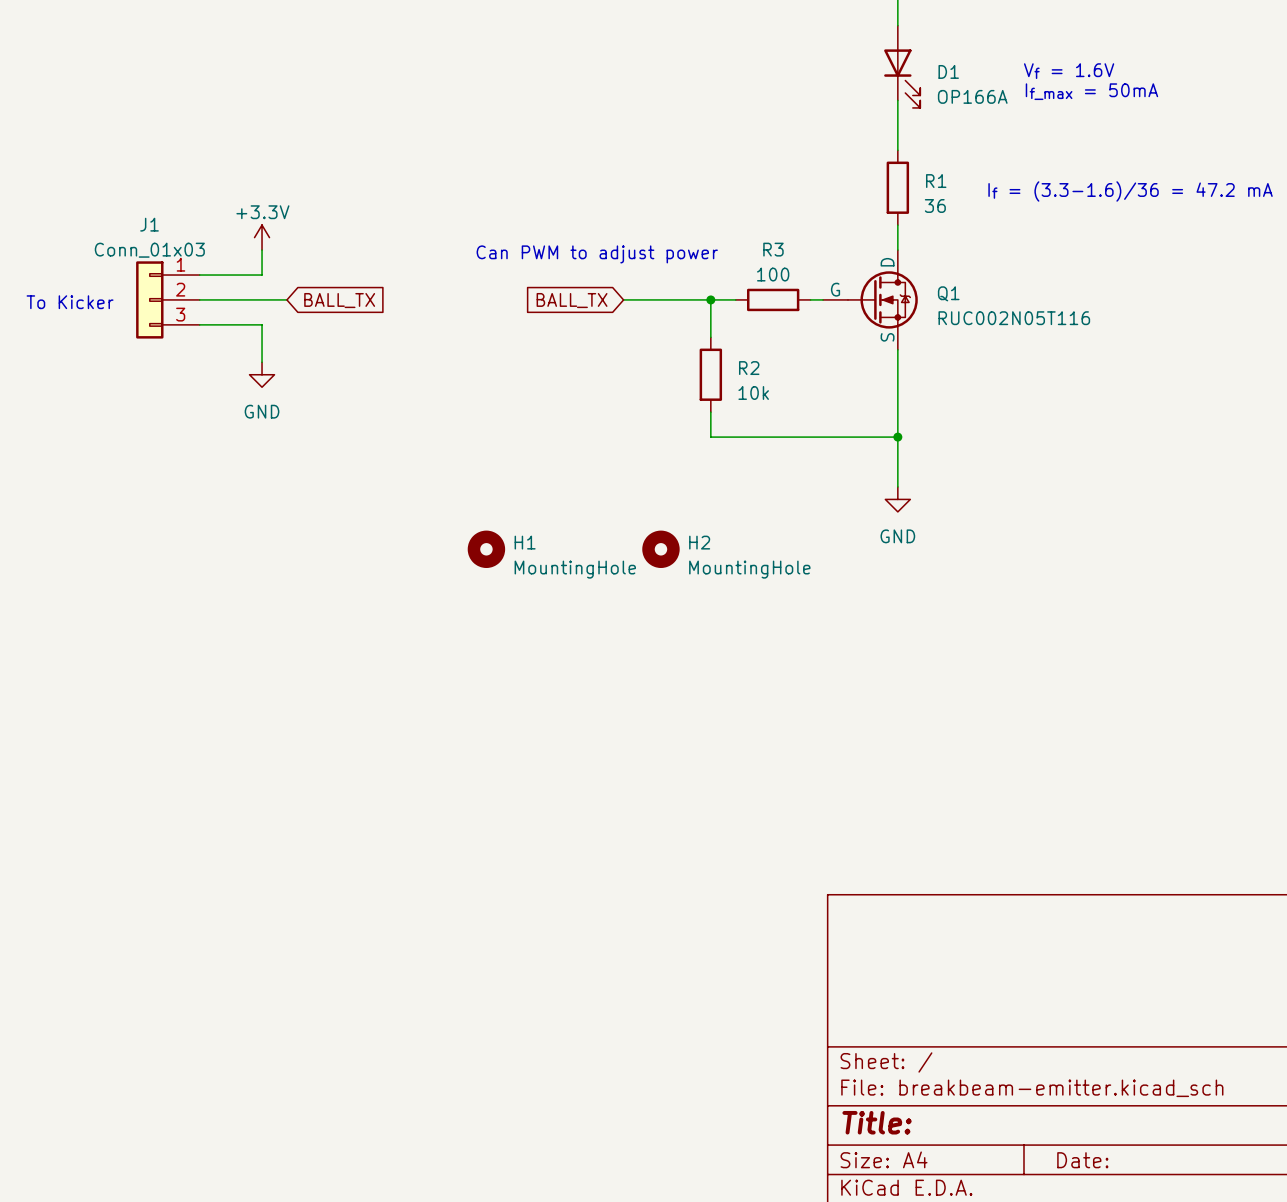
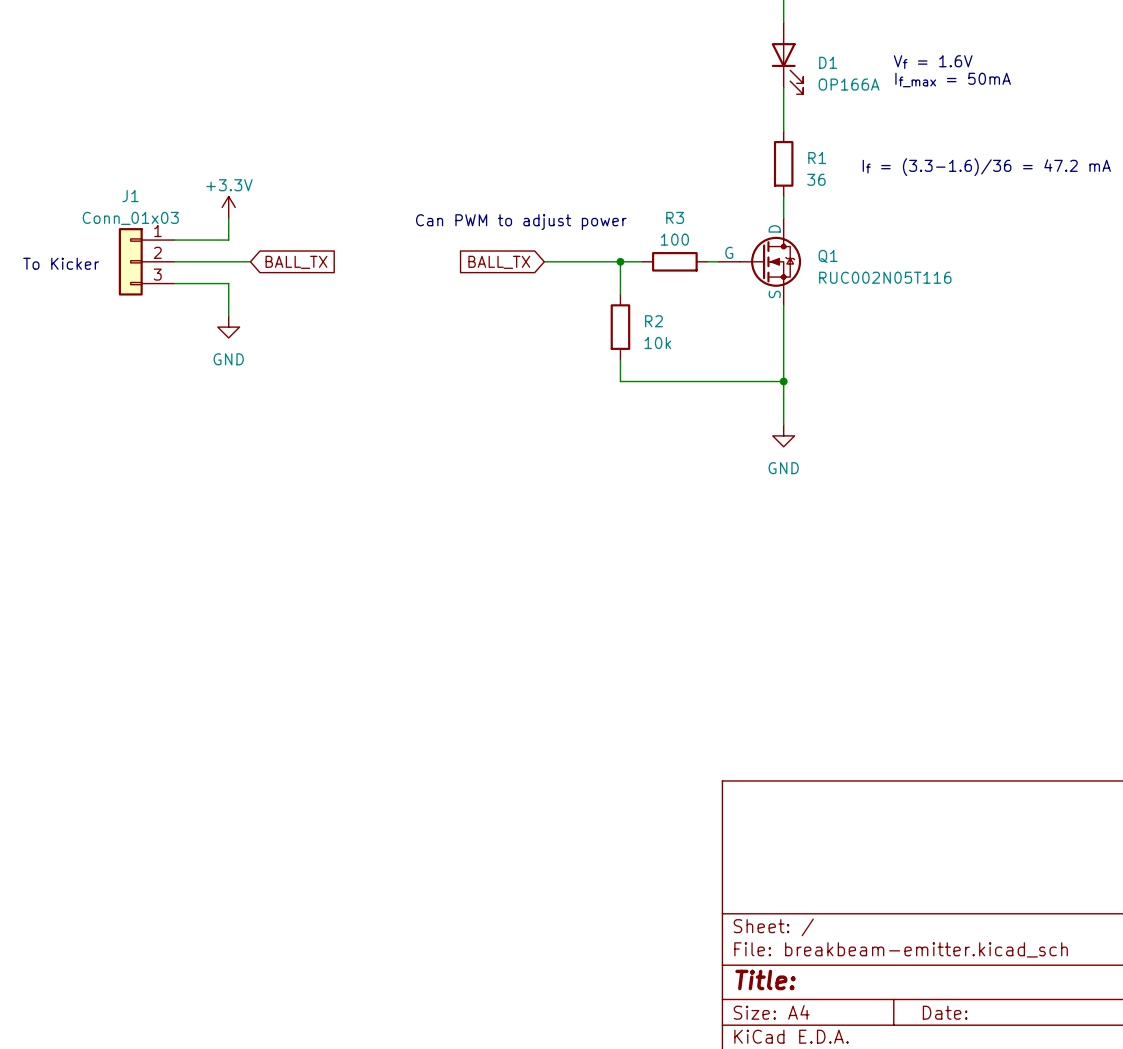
H1: MountingHole (486, 549) -> none
H2: MountingHole (660, 549) -> none

